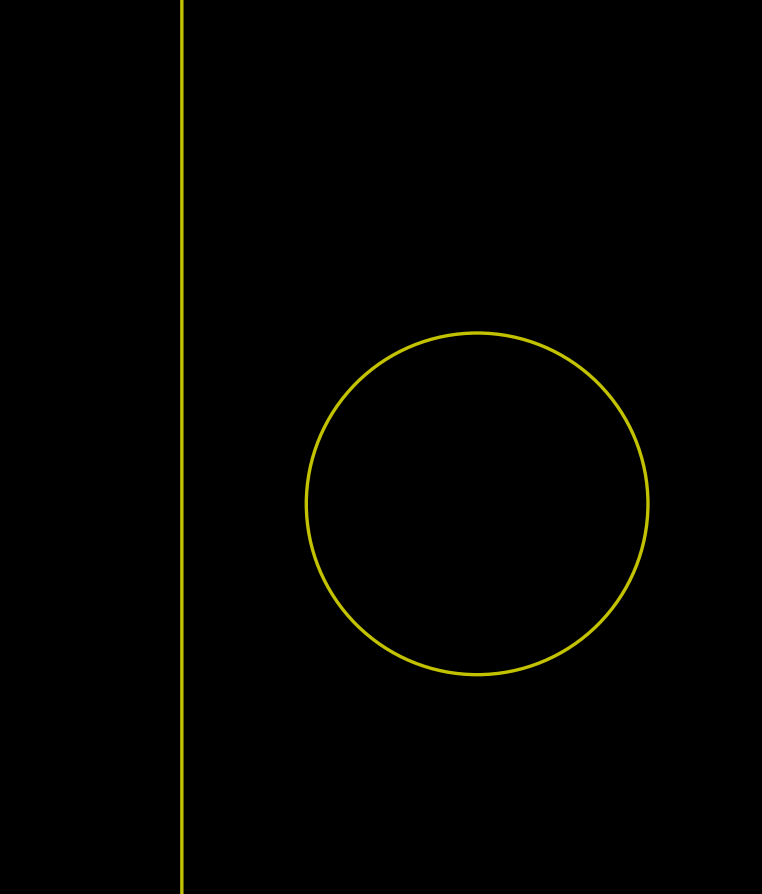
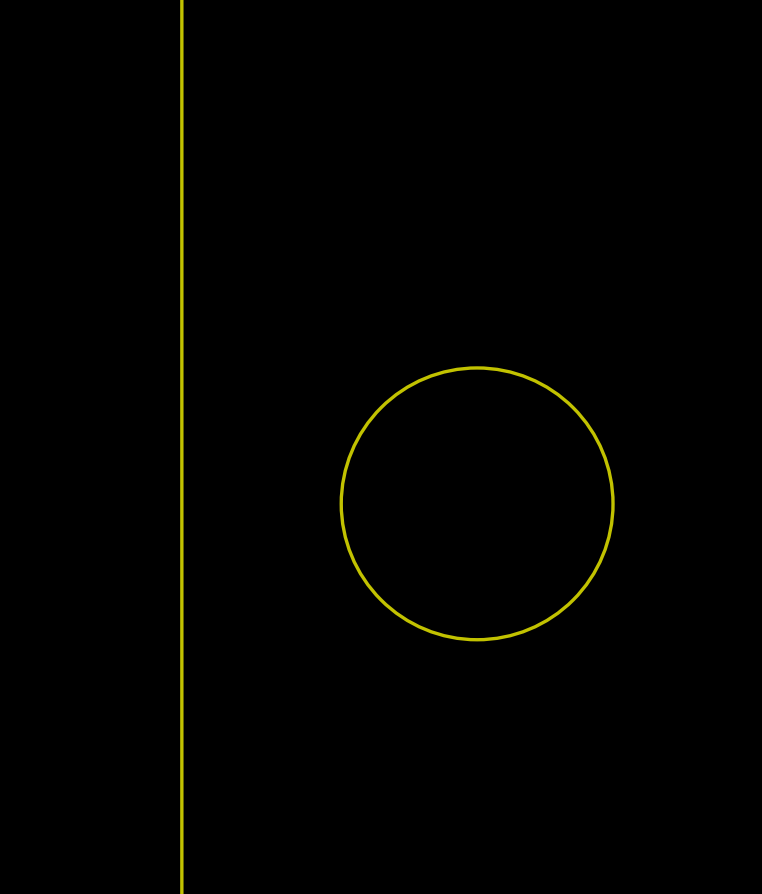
round board edge size: [304, 331, 650, 677] -> [339, 366, 615, 642]

